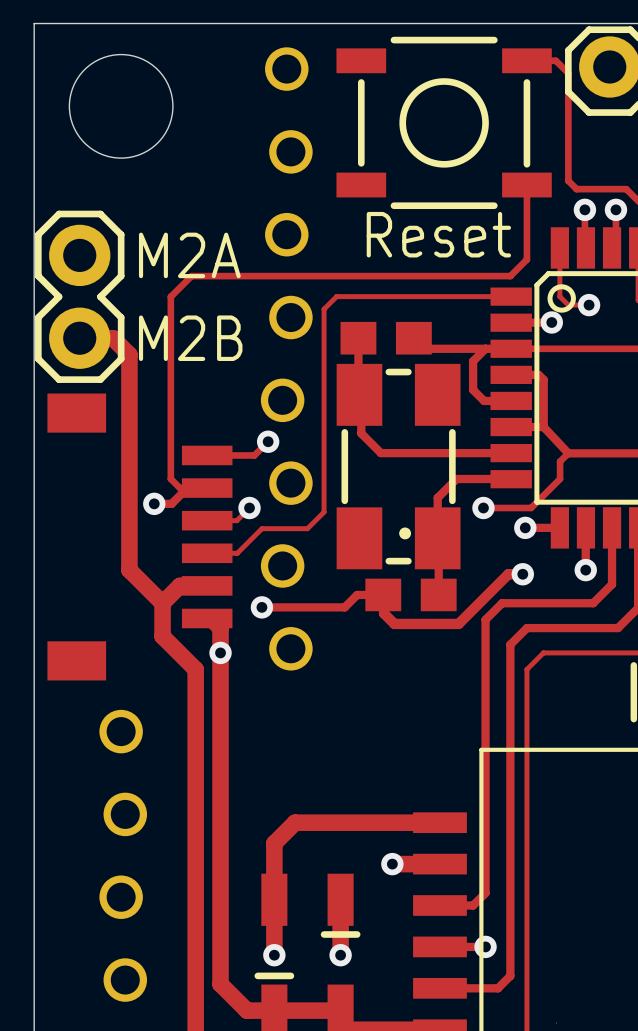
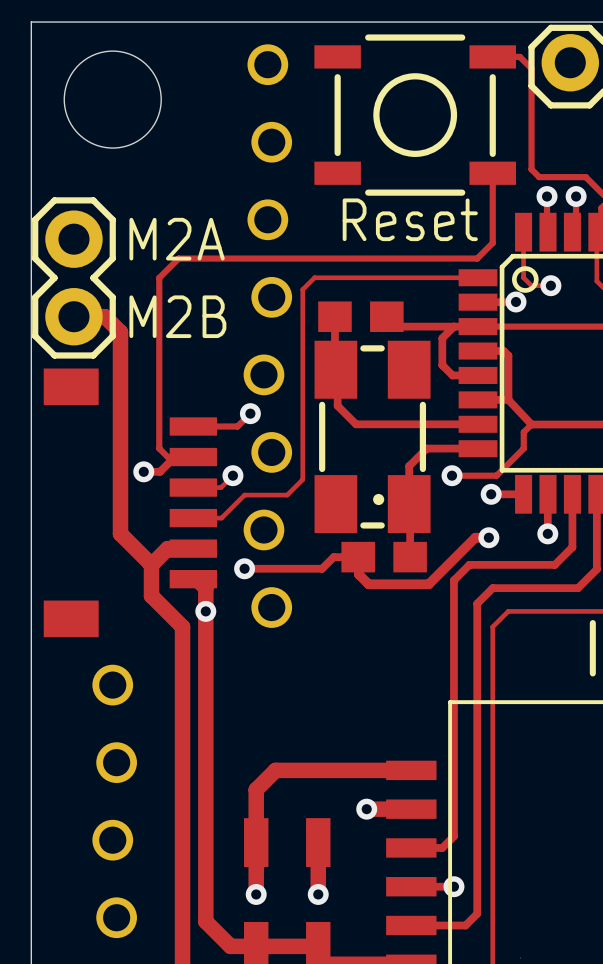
line: (324, 934) (357, 934) -> none
line: (257, 975) (290, 975) -> none

